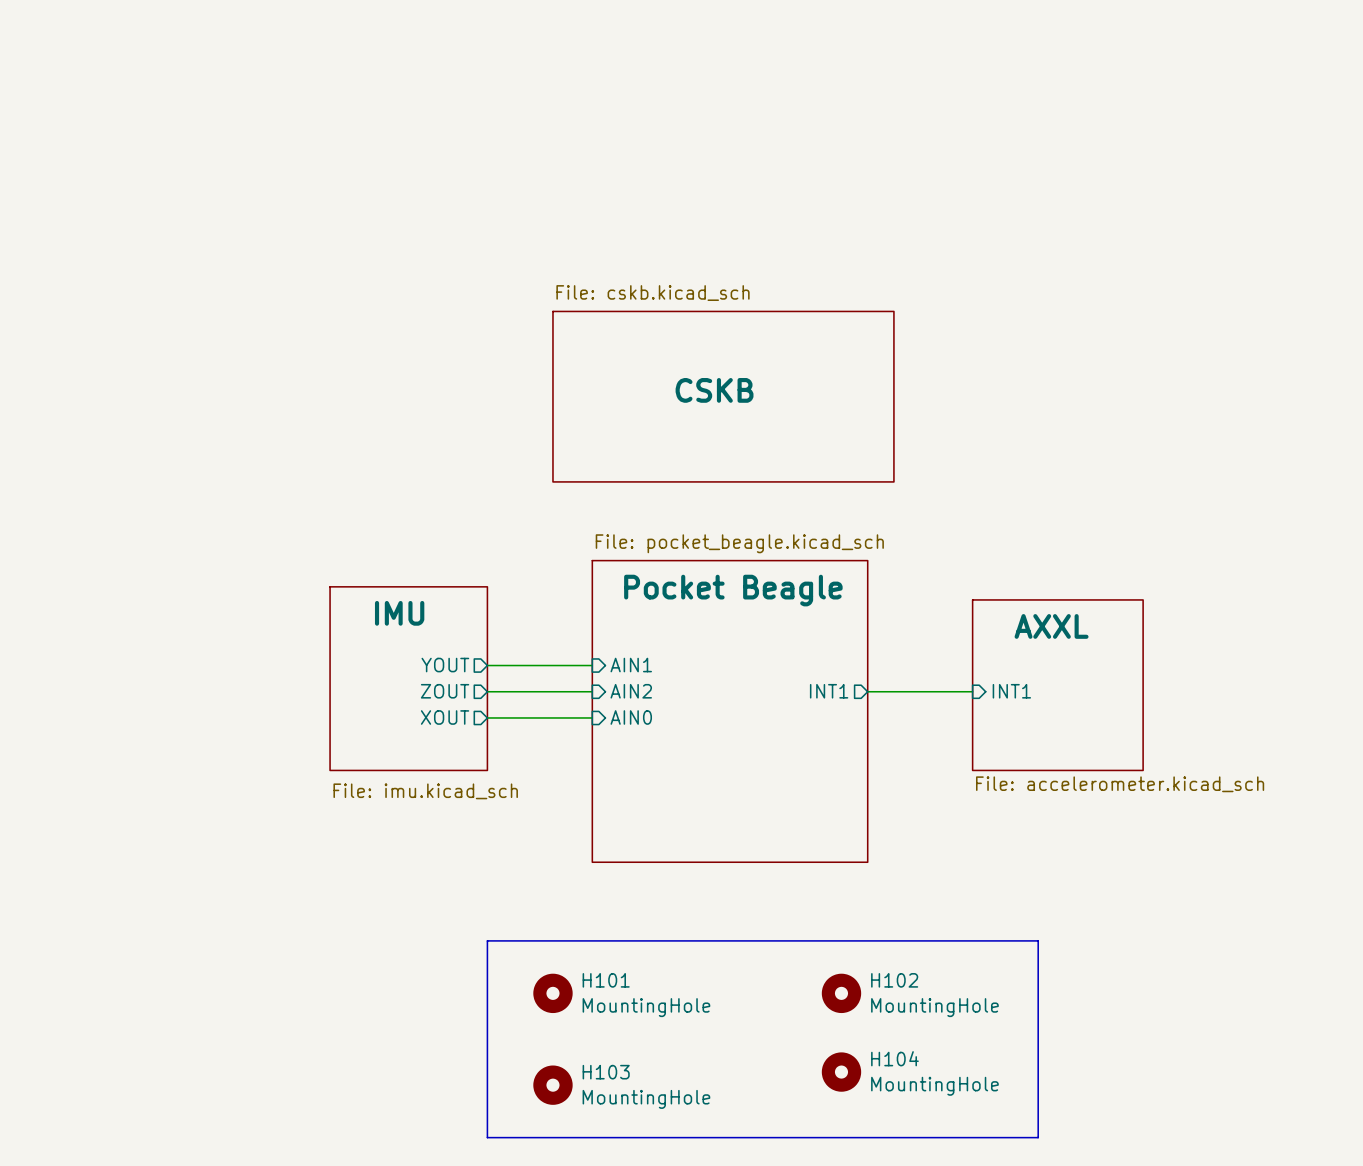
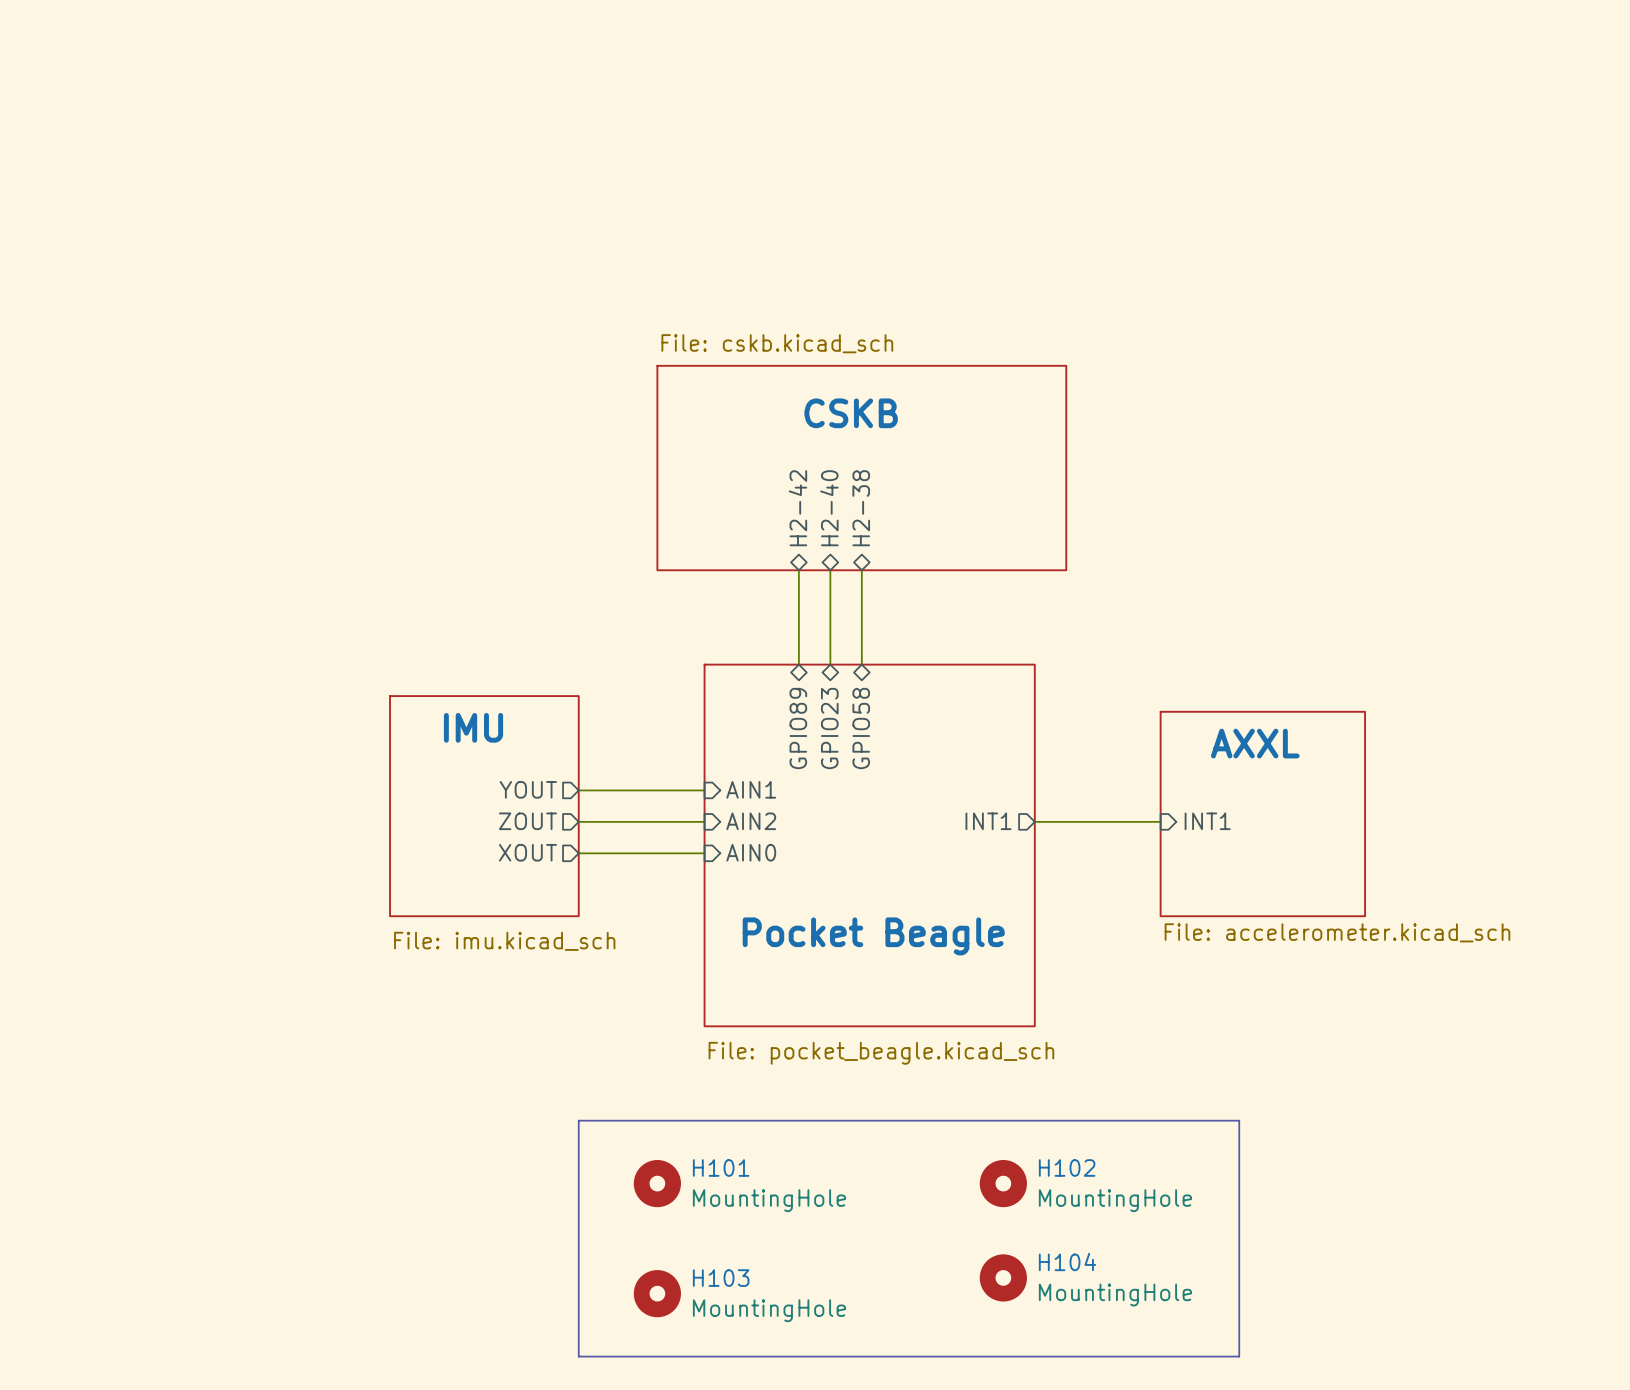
sheet CSKB name position: CSKB (714, 390) -> CSKB (851, 413)
sheet pin: none -> H2-42 (797, 508)
sheet pin: none -> H2-40 (829, 508)
sheet pin: none -> H2-38 (861, 508)
wire: none -> (798, 570) (798, 664)
wire: none -> (830, 570) (830, 664)
wire: none -> (861, 570) (861, 664)
sheet Pocket Beagle value position: File: pocket_beagle.kicad_sch (739, 543) -> File: pocket_beagle.kicad_sch (881, 1053)
sheet Pocket Beagle name position: Pocket Beagle (733, 590) -> Pocket Beagle (873, 936)
sheet pin: none -> GPIO89 (798, 728)
sheet pin: none -> GPIO23 (829, 728)
sheet pin: none -> GPIO58 (861, 728)

